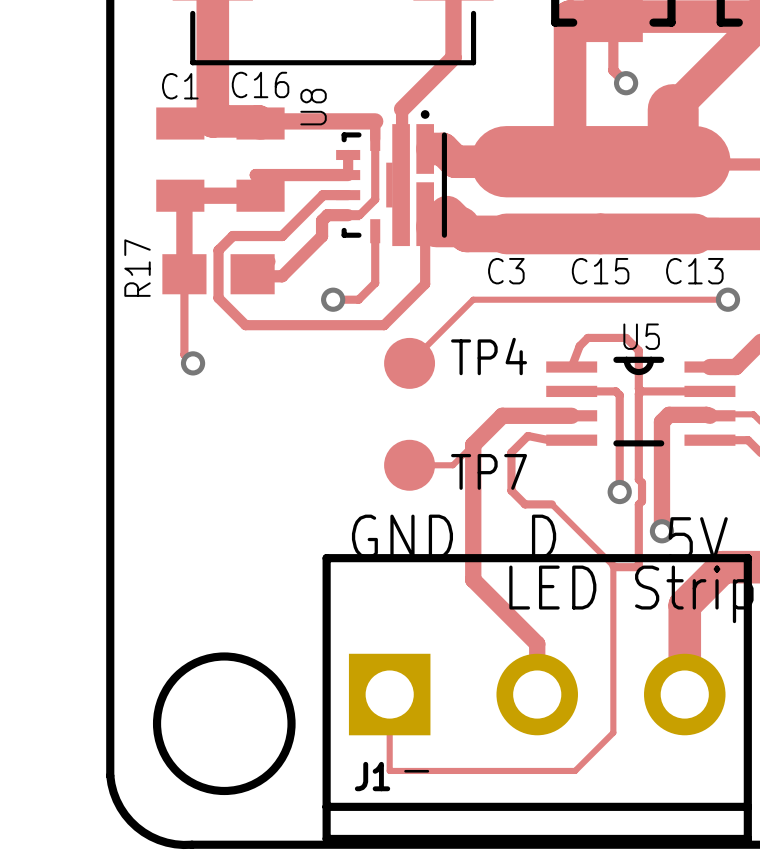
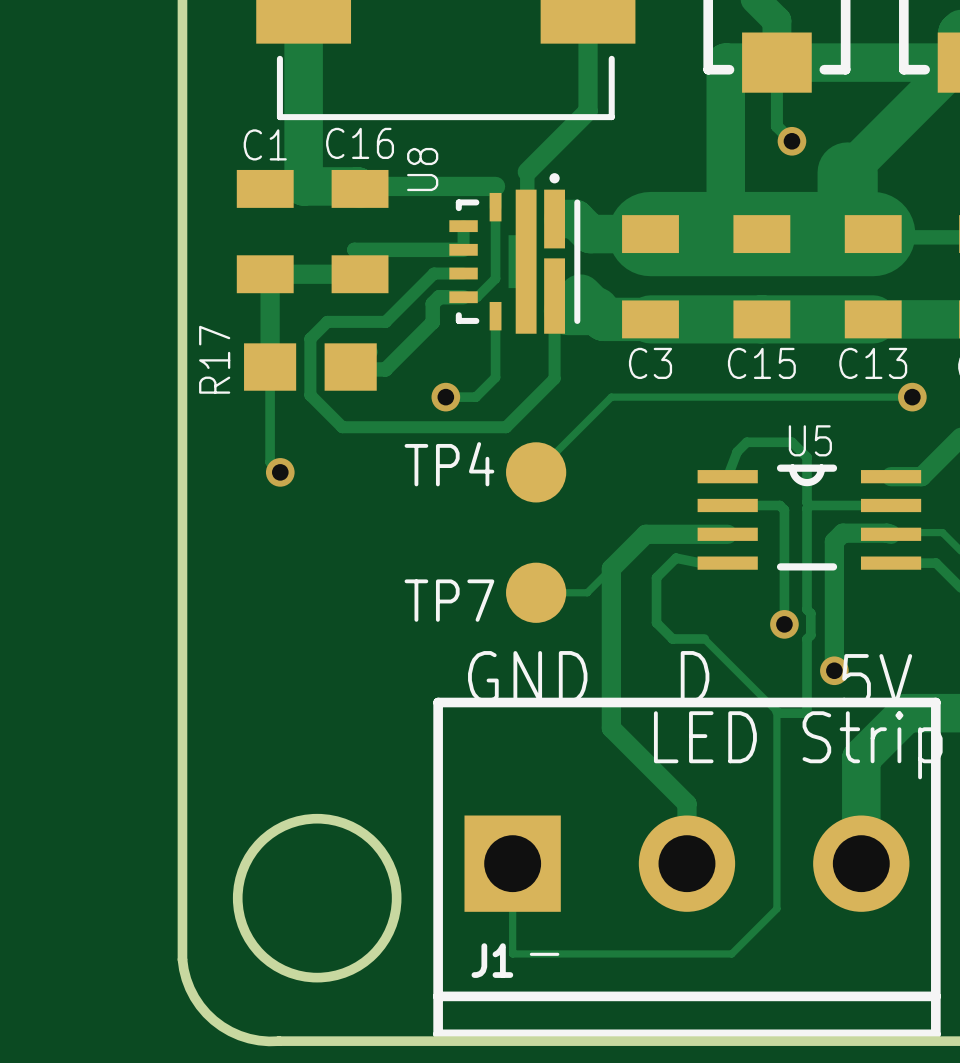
TP4 name position: TP4 (489, 356) -> TP4 (449, 464)
TP7 name position: TP7 (489, 471) -> TP7 (449, 600)

